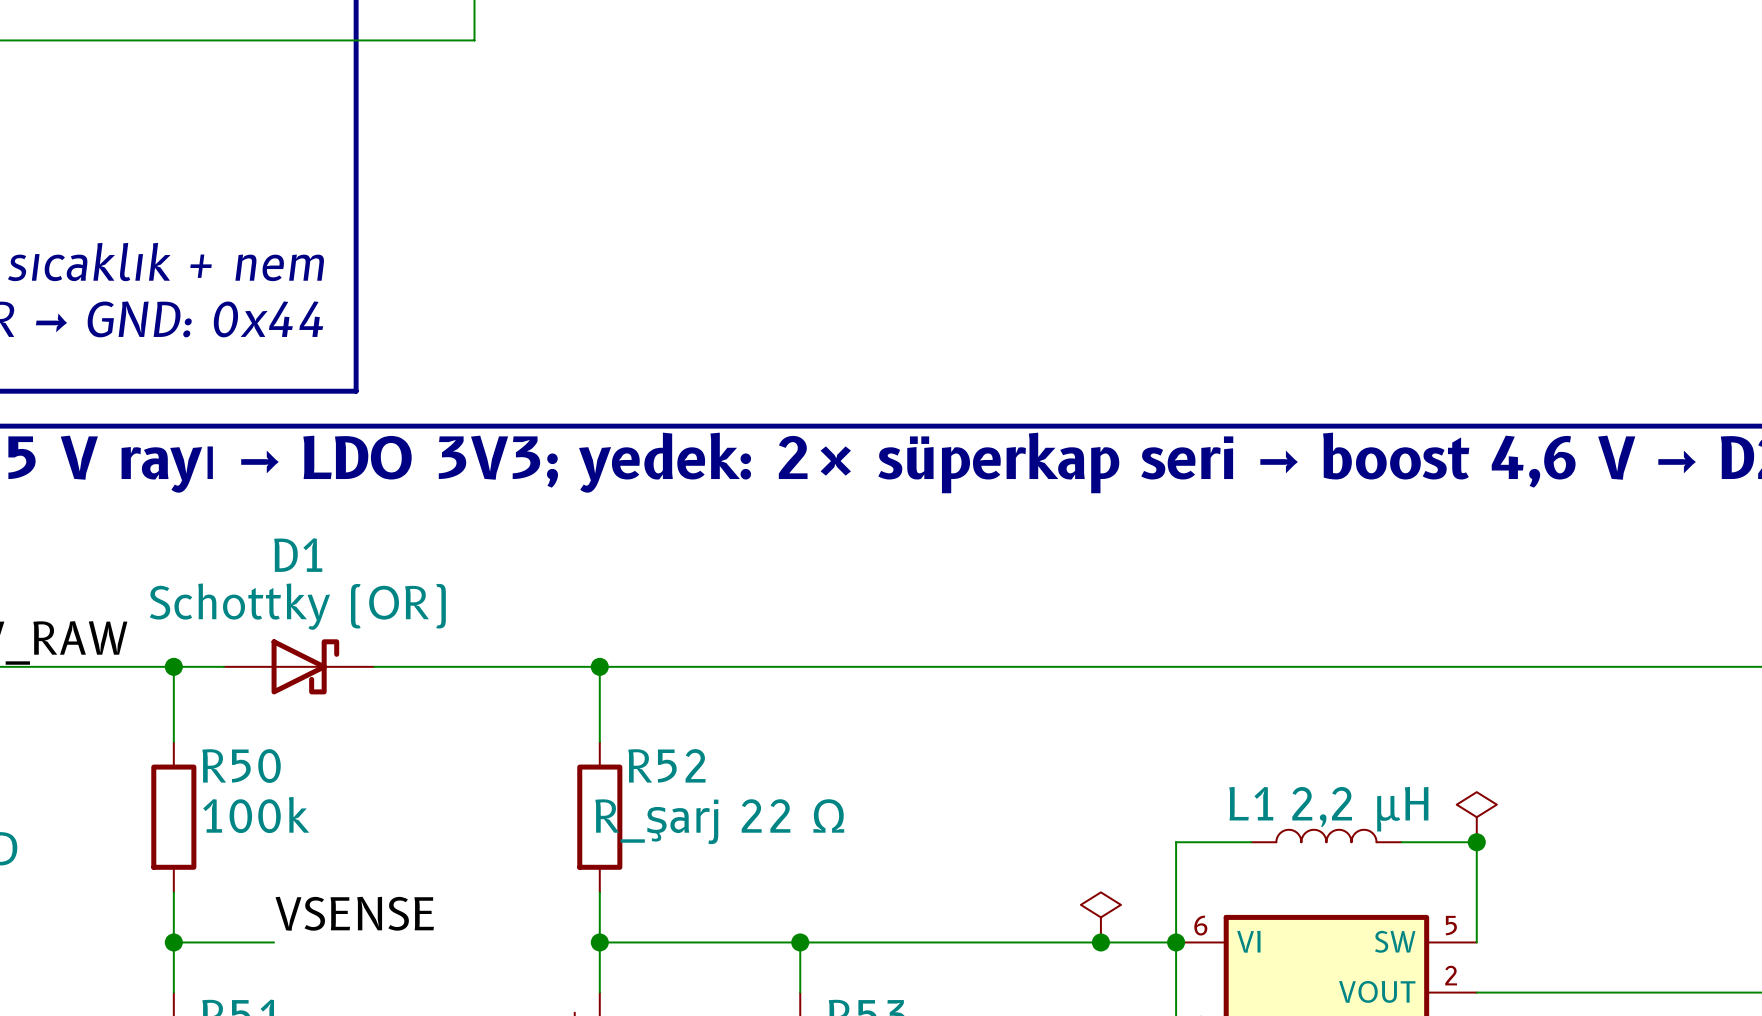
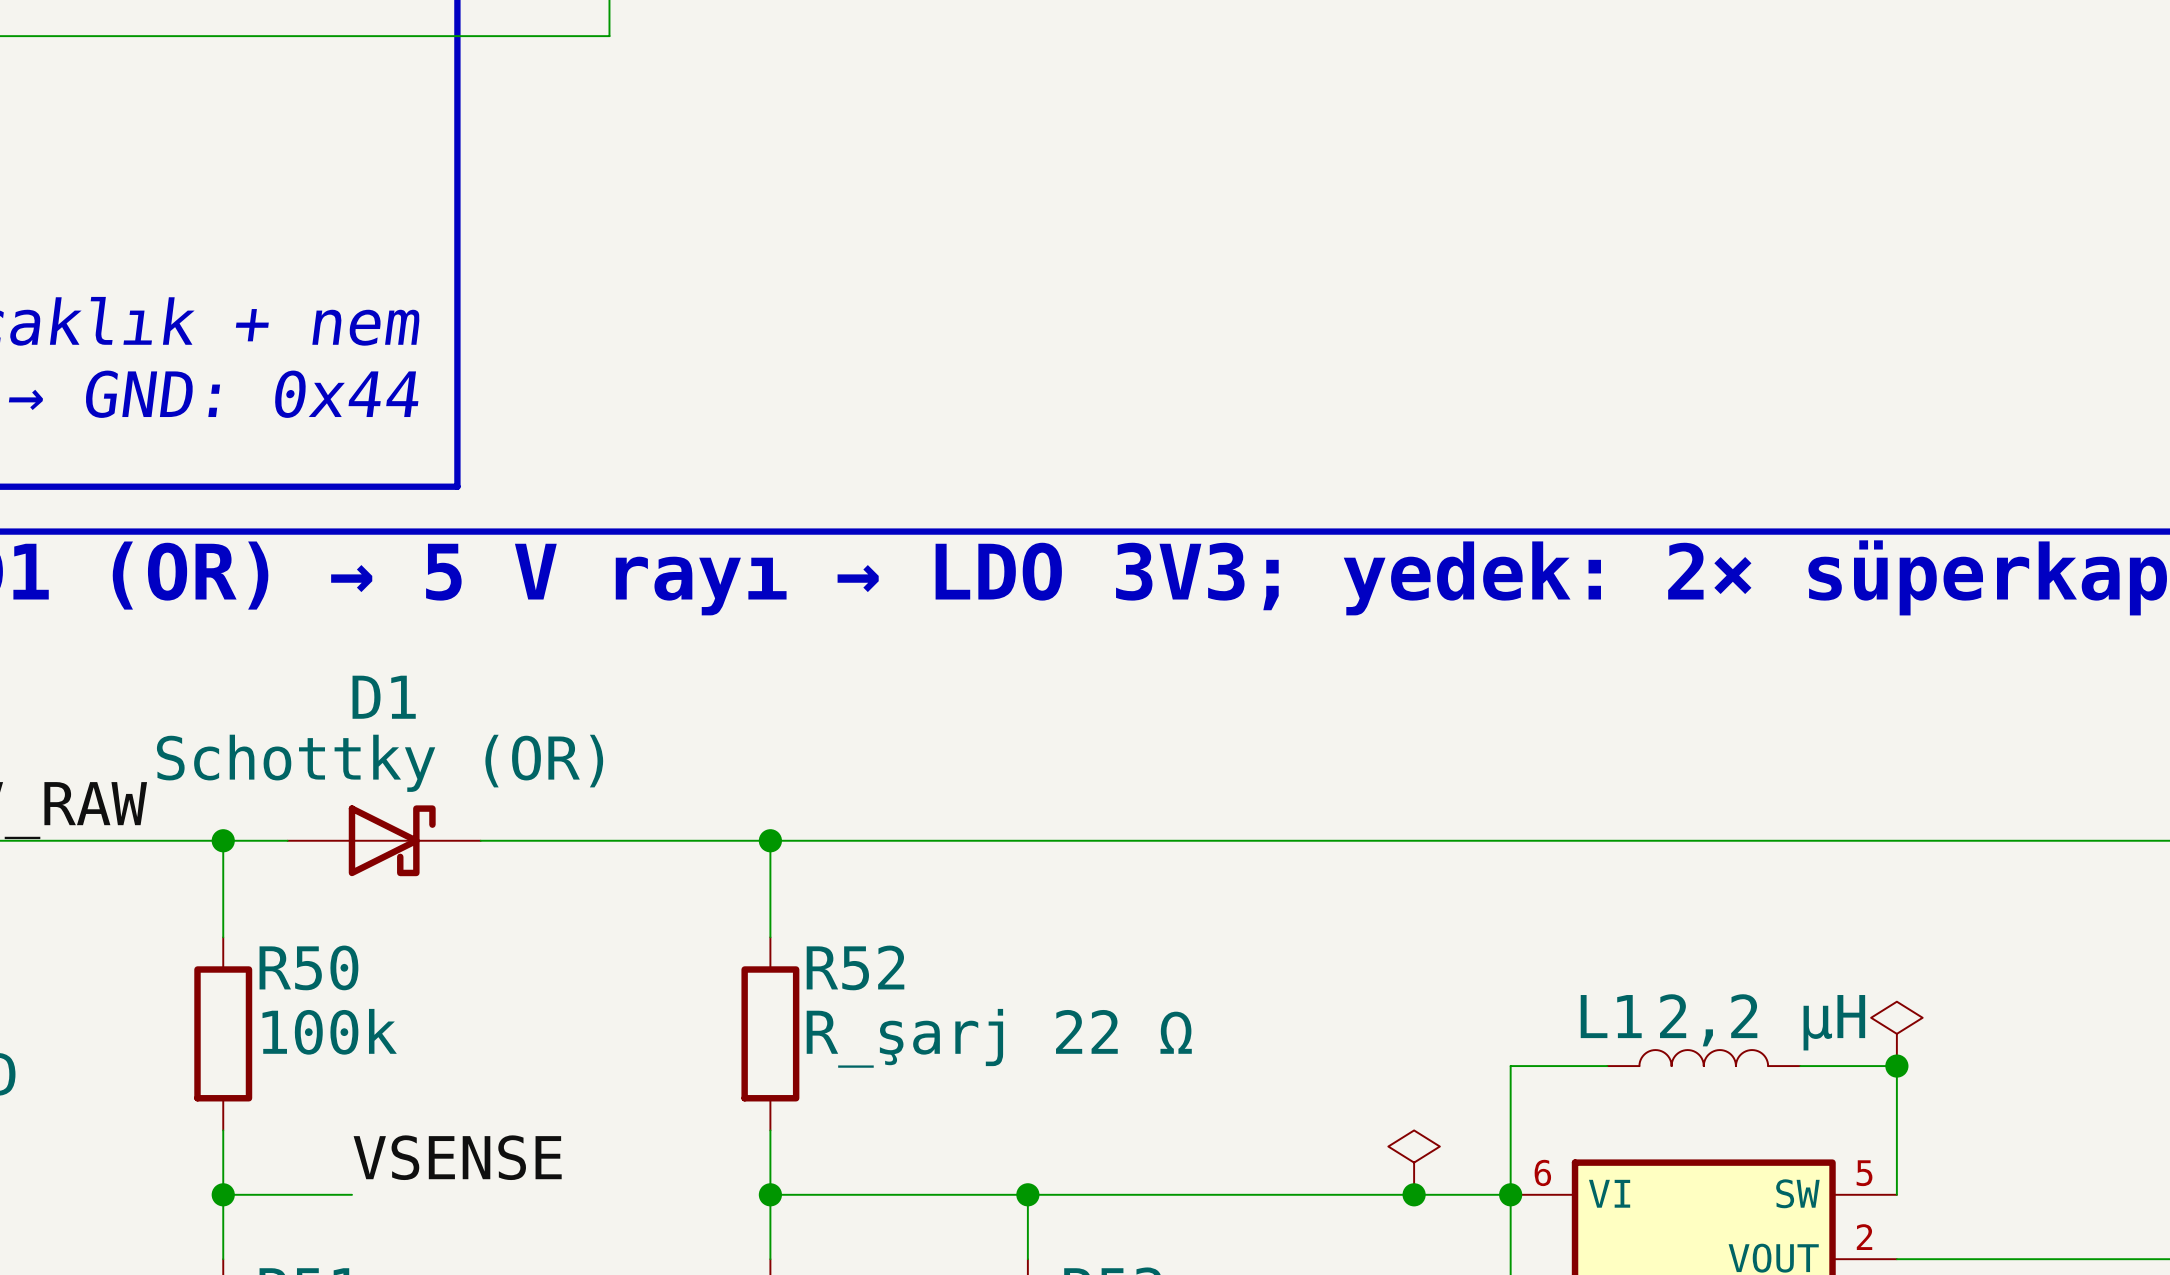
R52 value position: R_şarj 22 Ω (719, 821) -> R_şarj 22 Ω (999, 1038)

